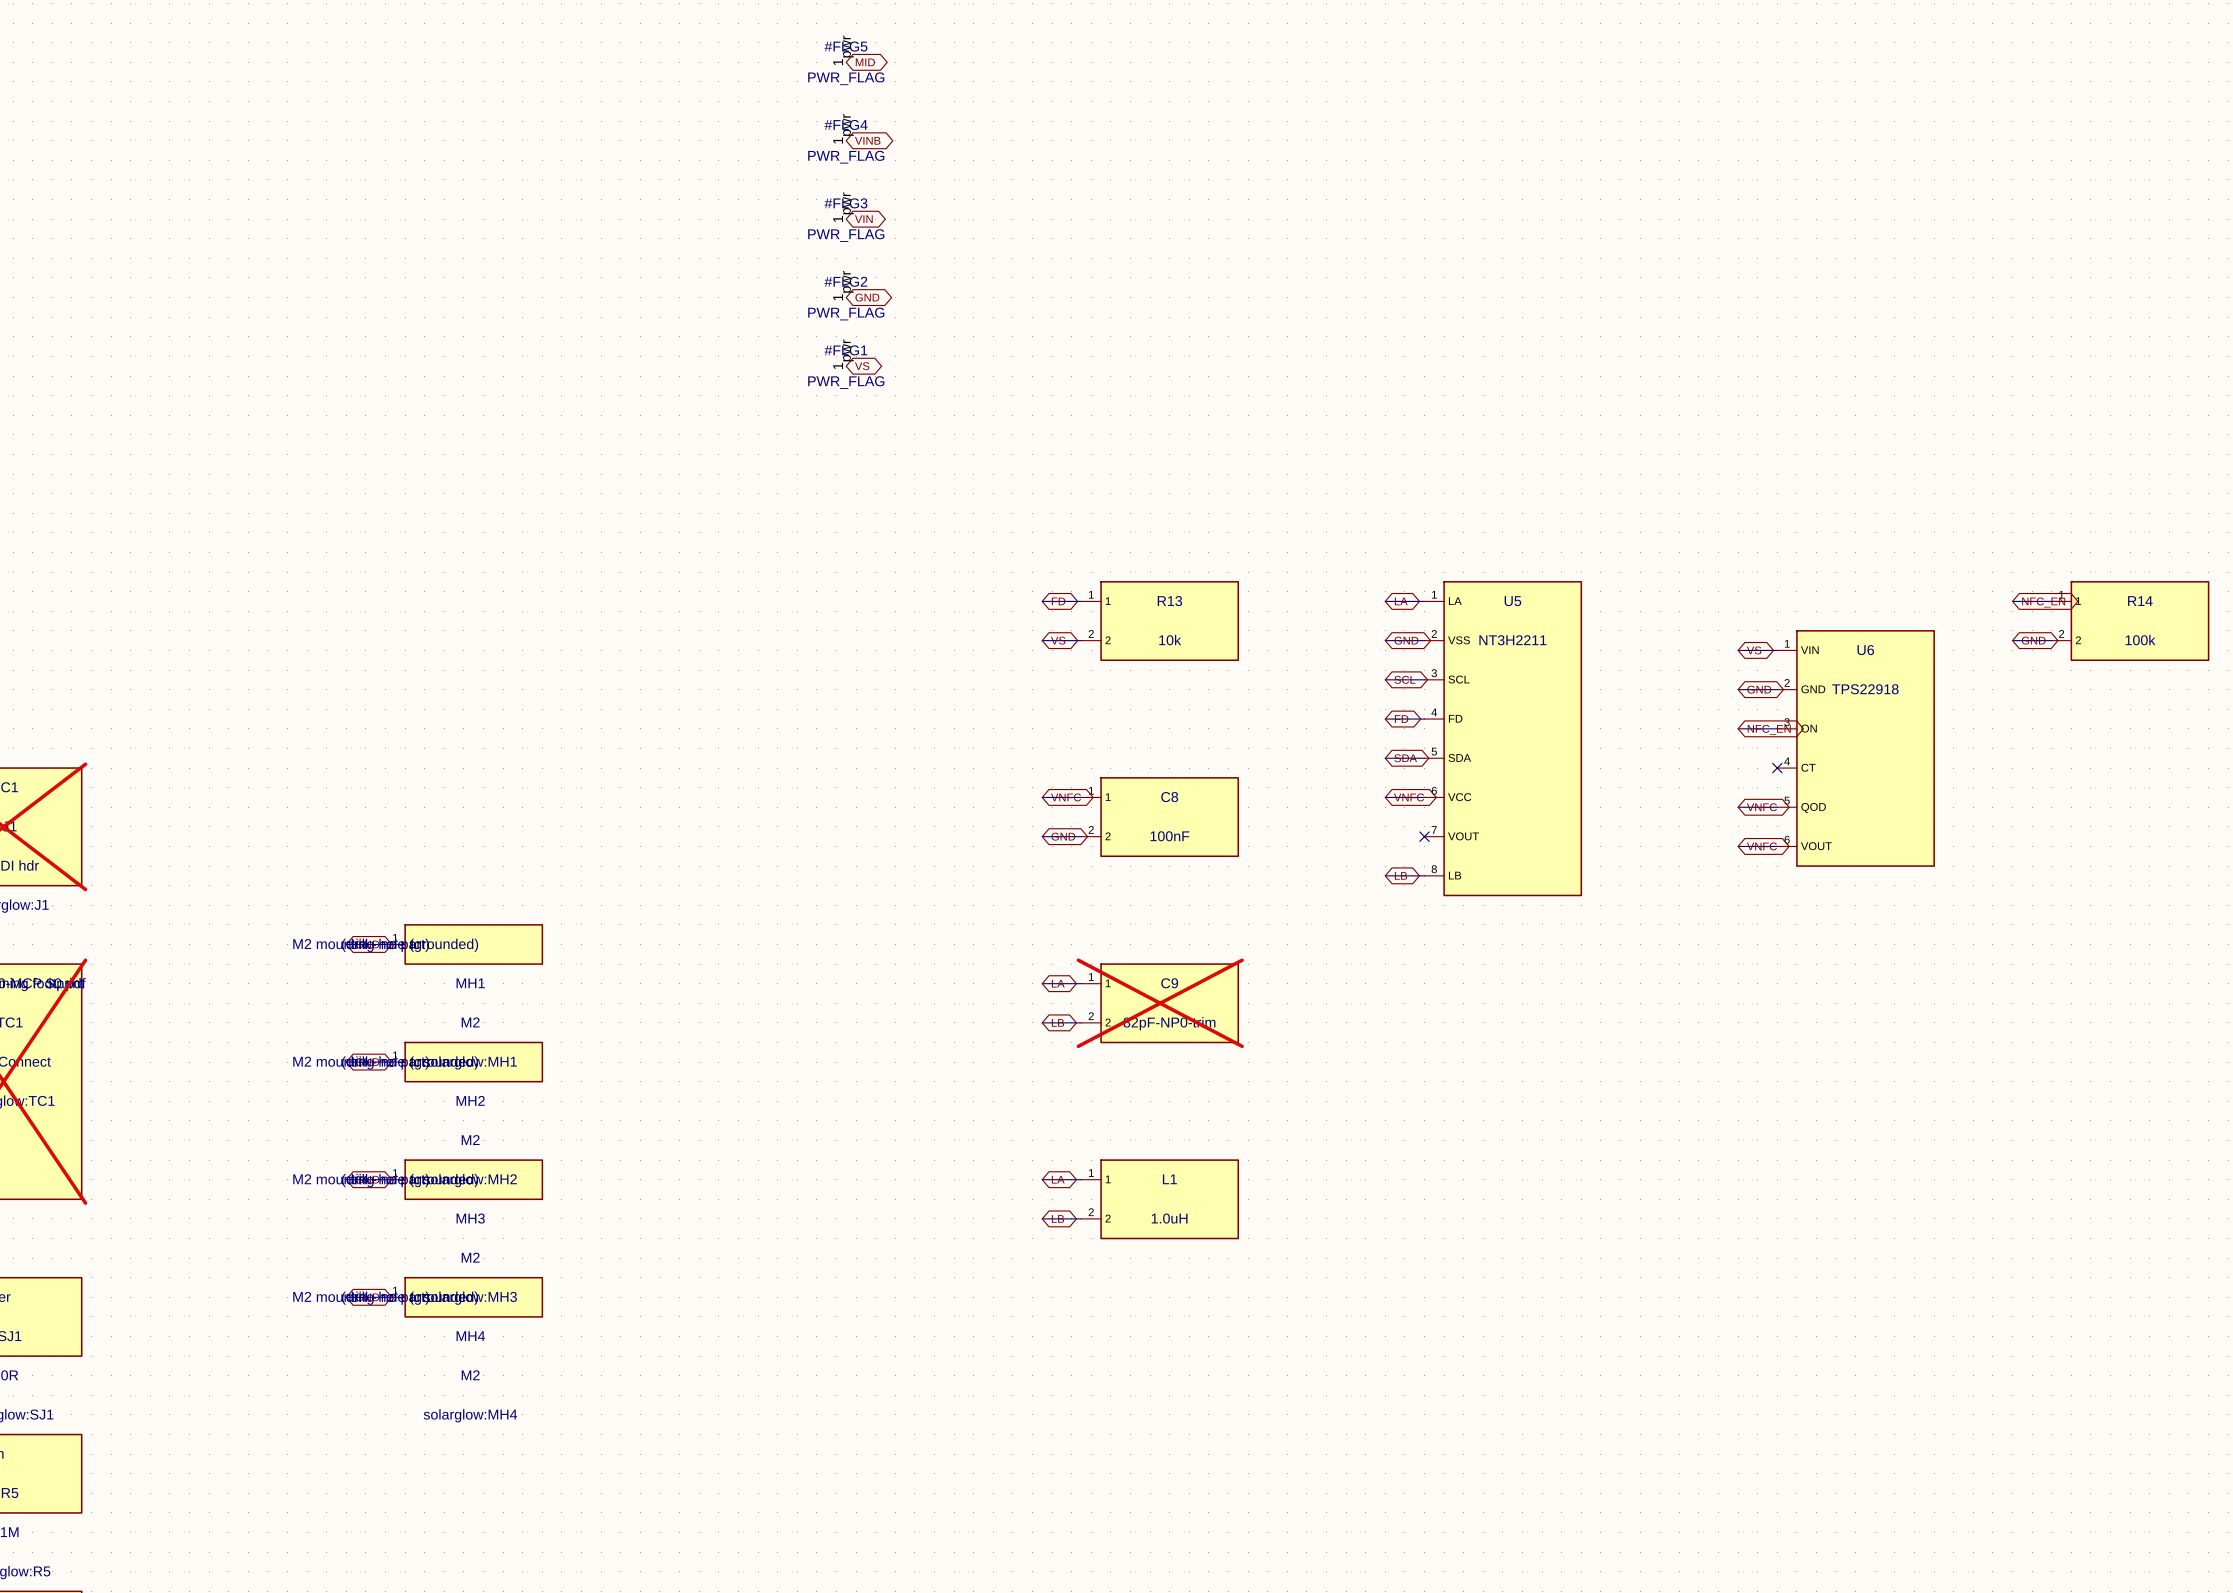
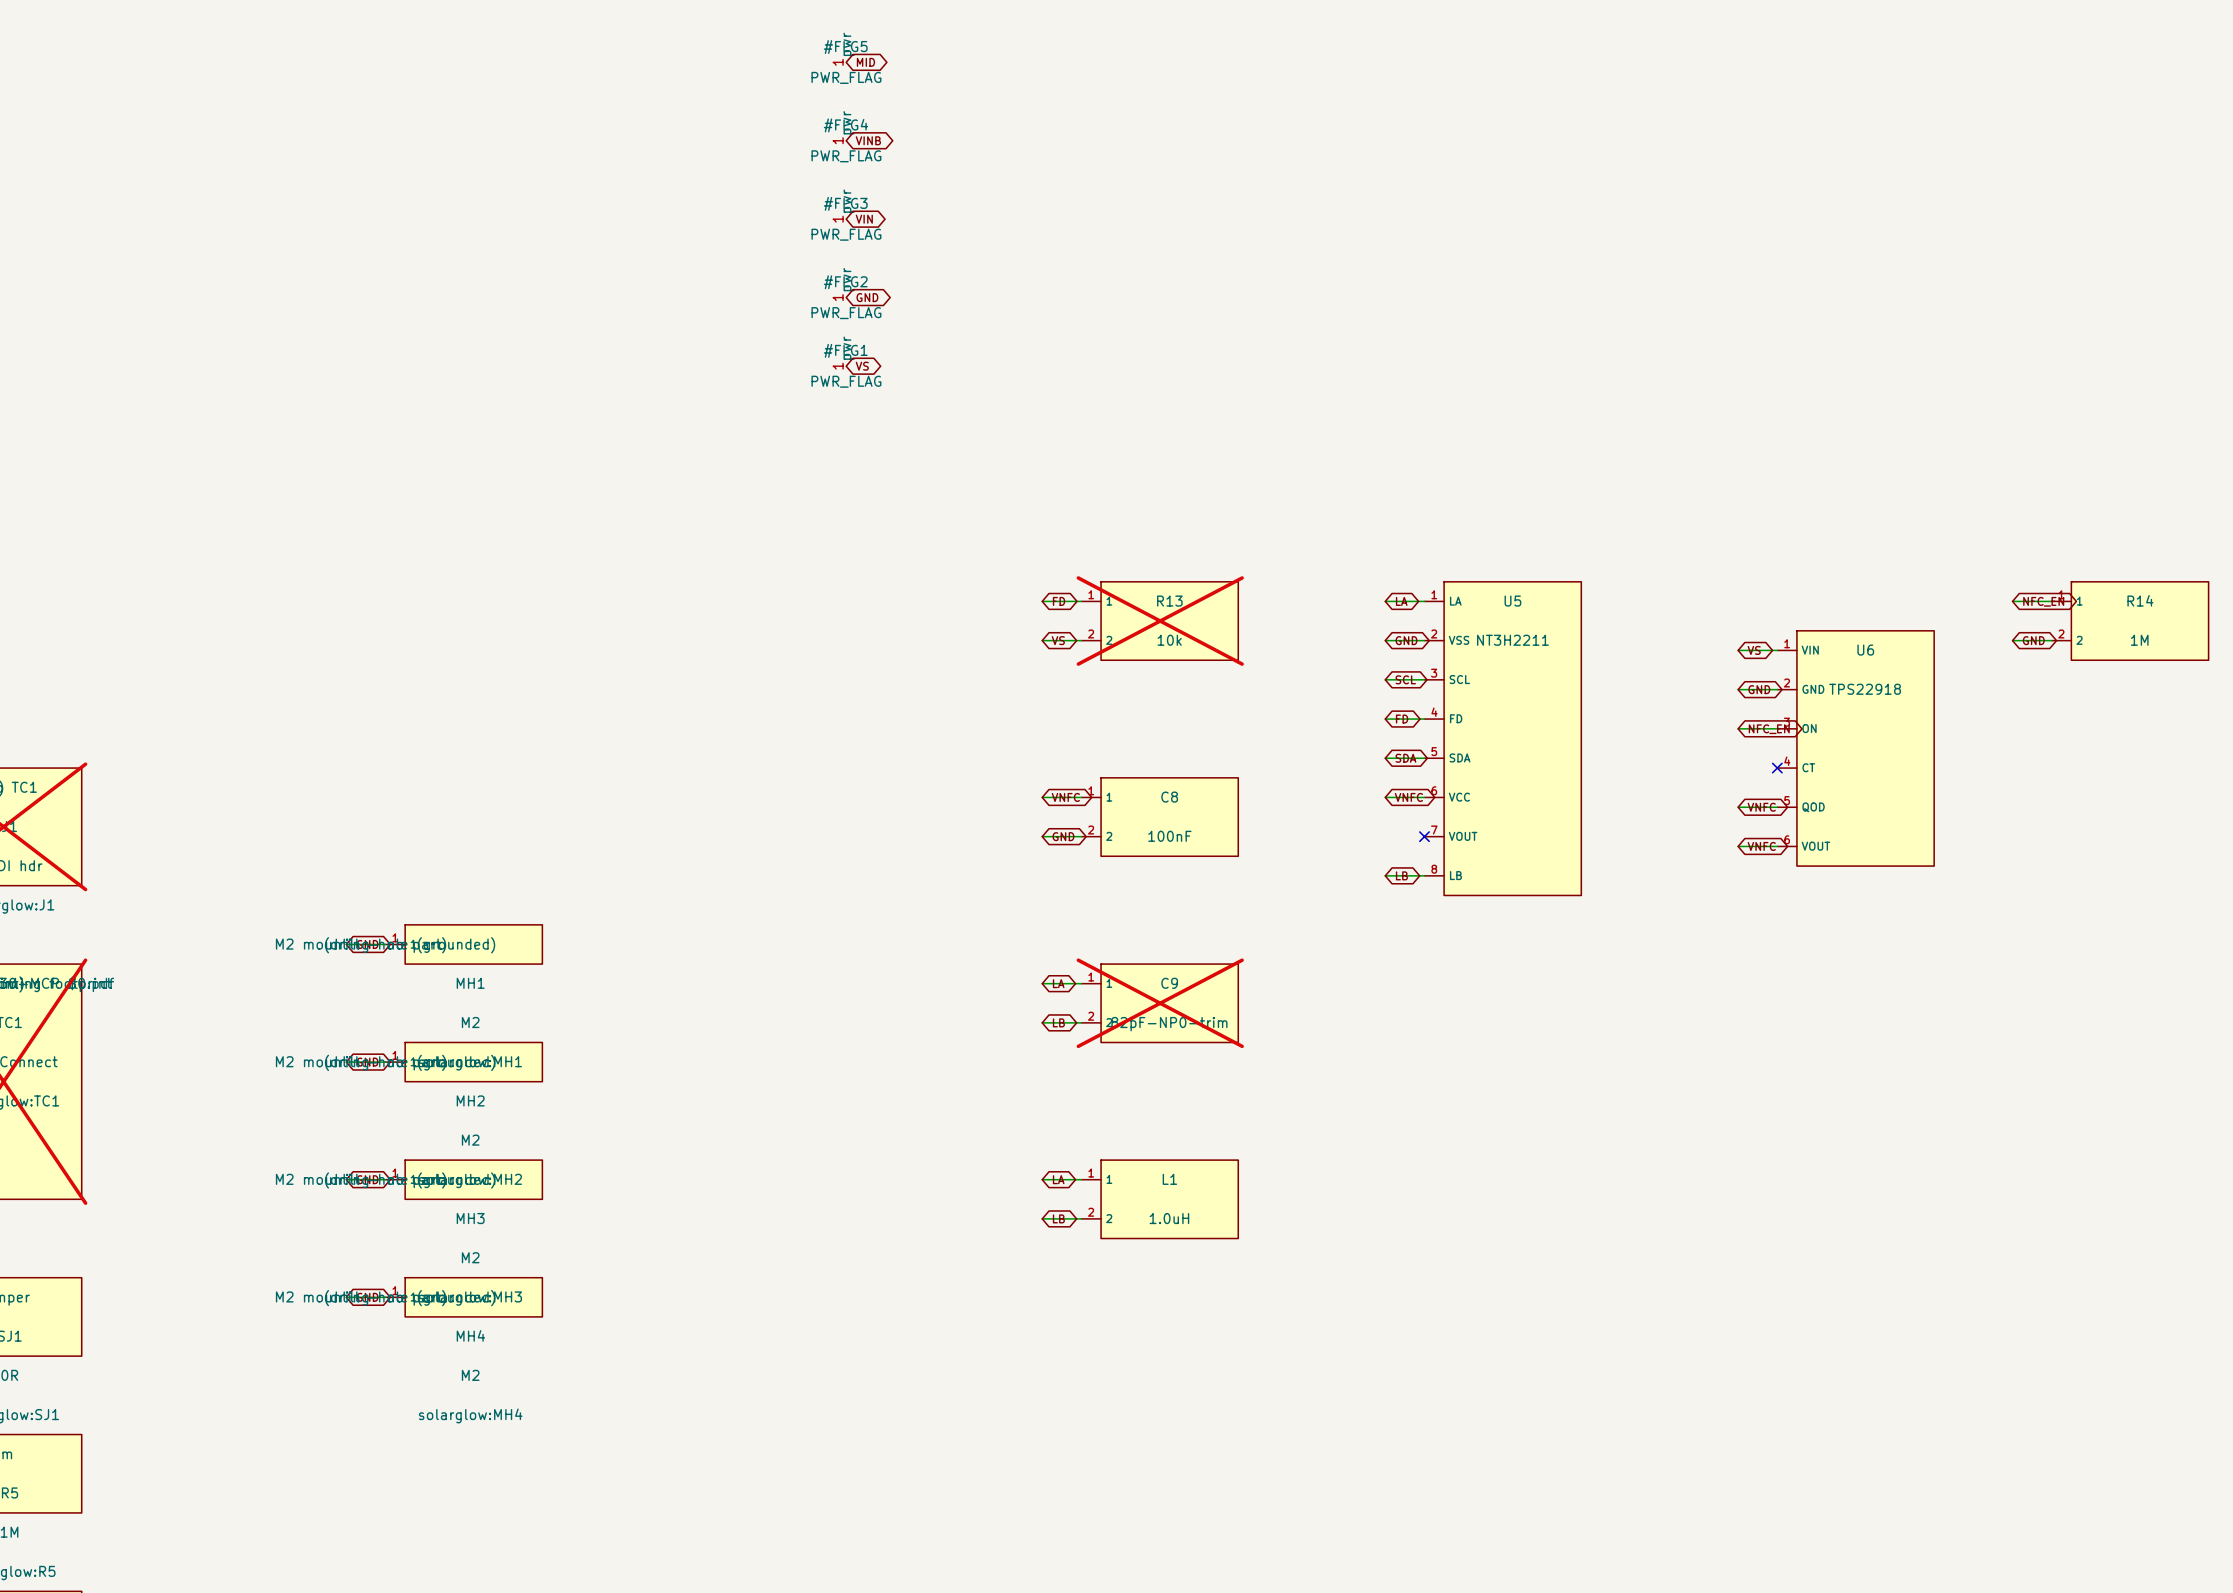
R13 do-not-place cross: none -> (1160, 621)
R14 value: 100k (2140, 640) -> 1M (2139, 640)

